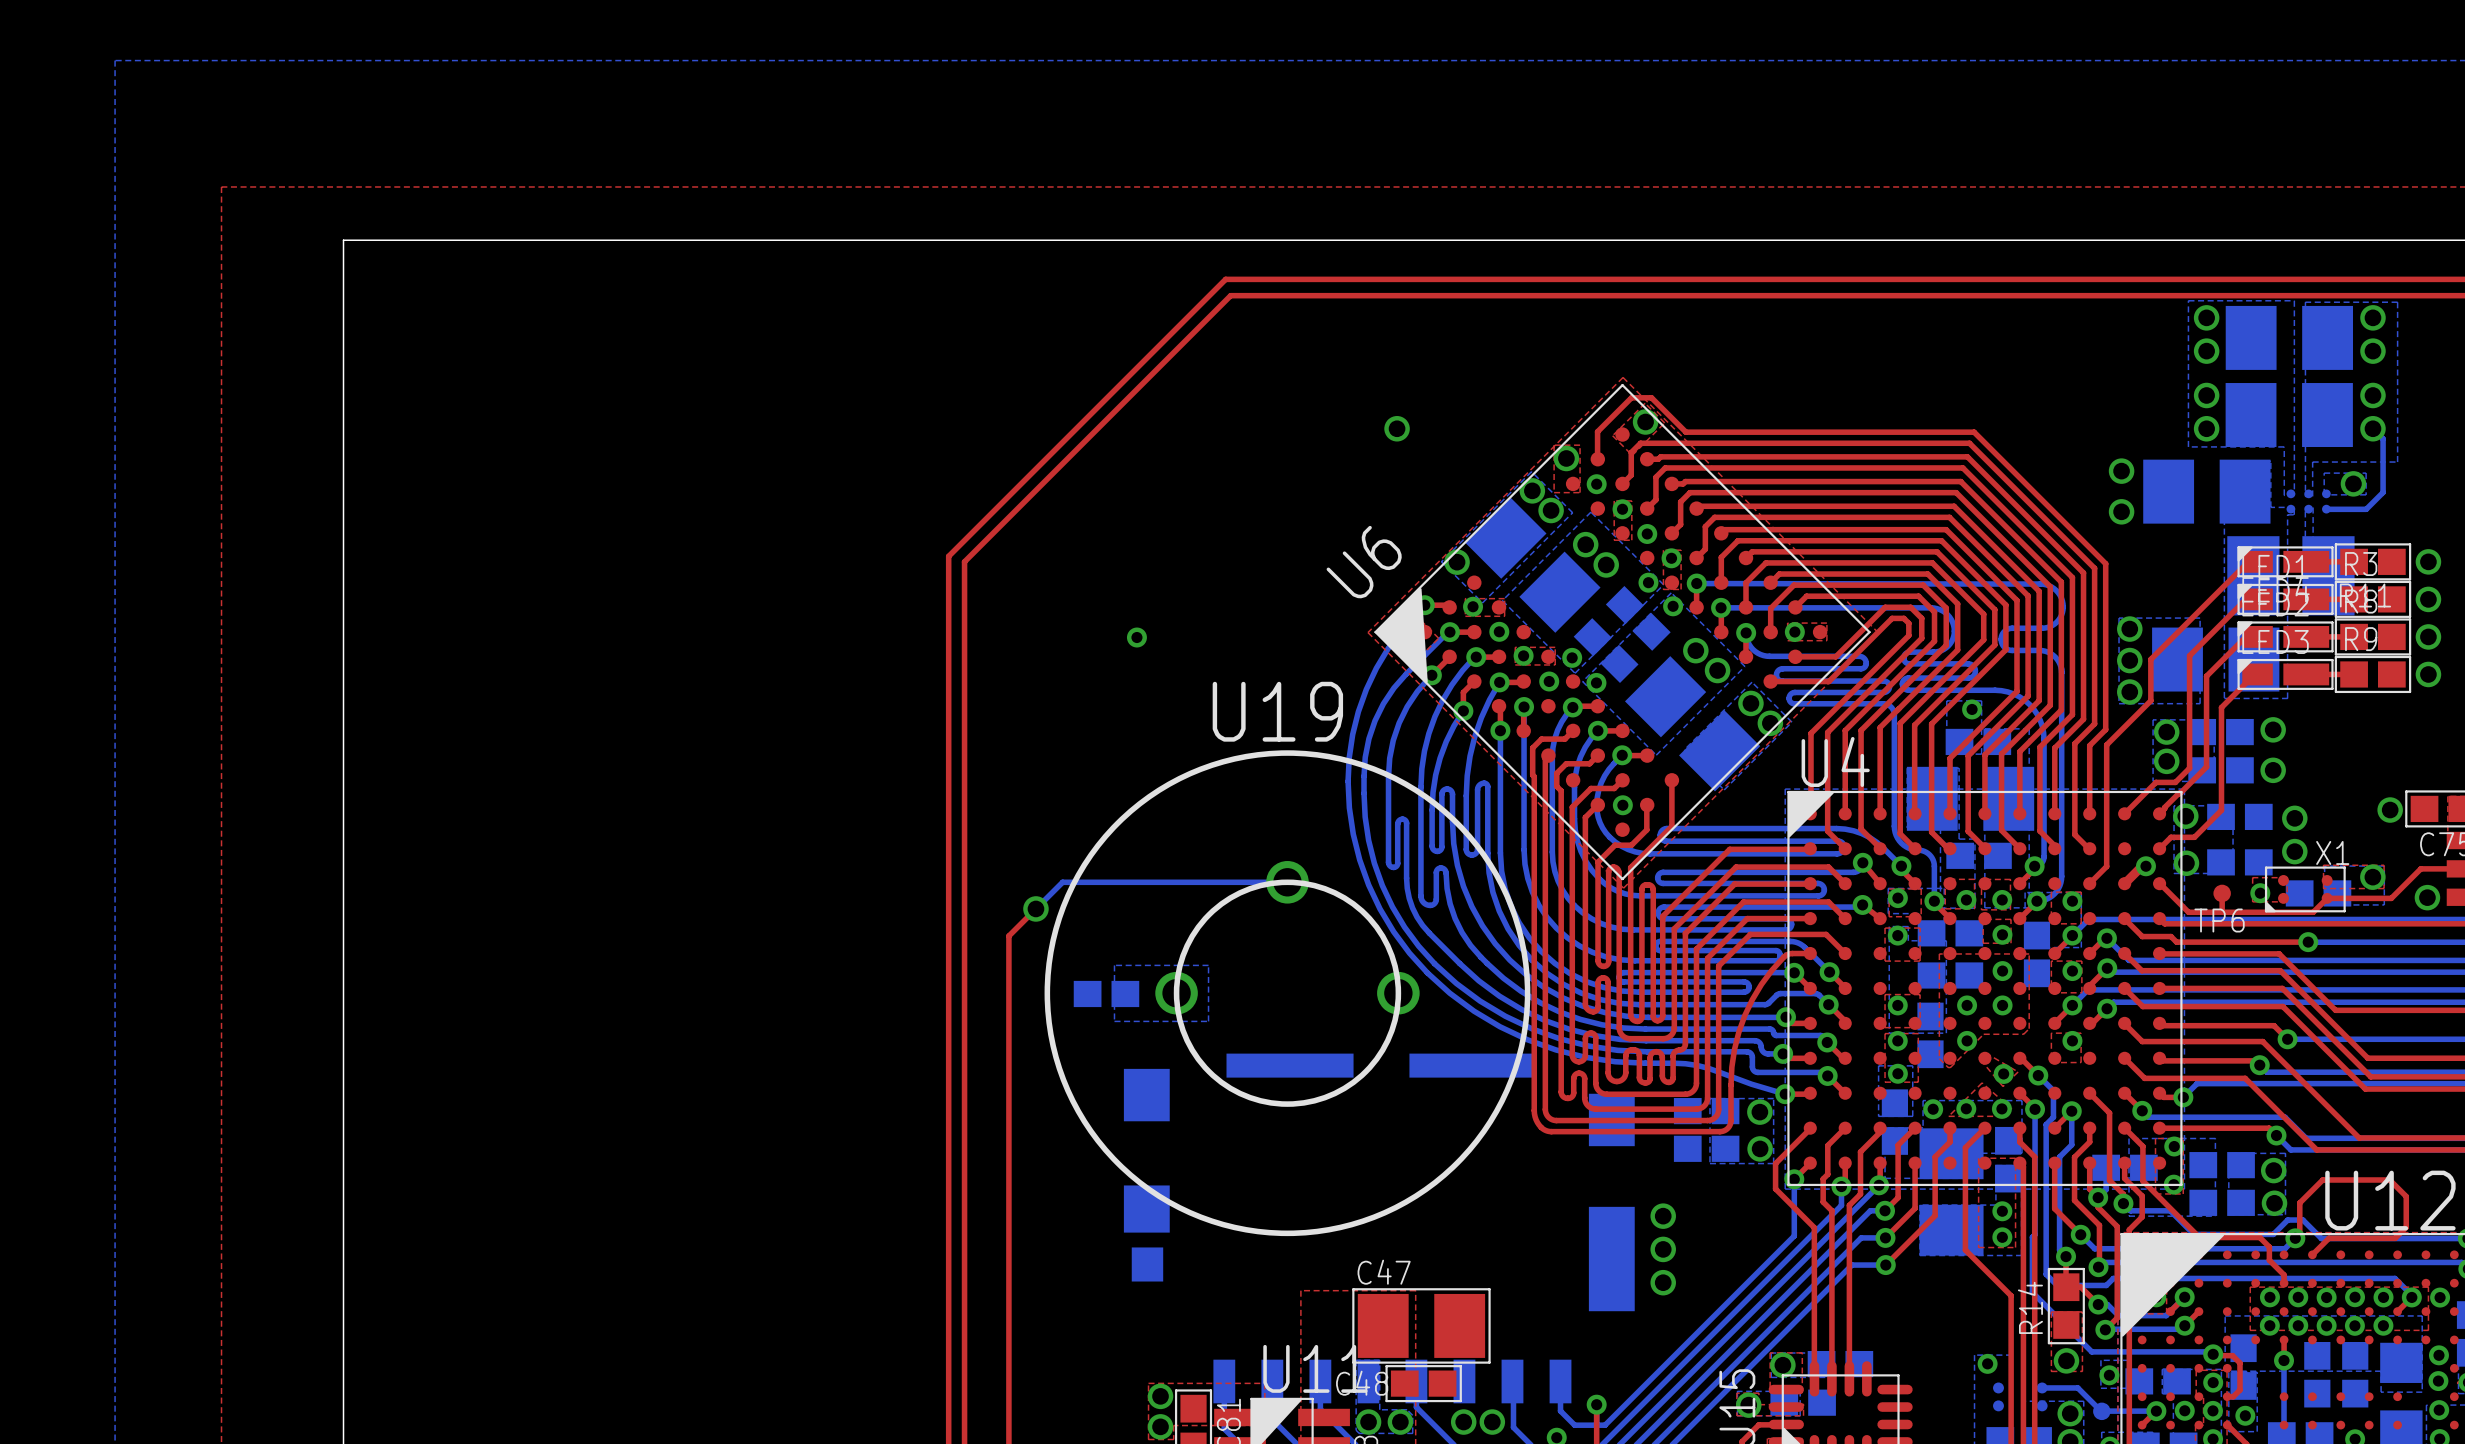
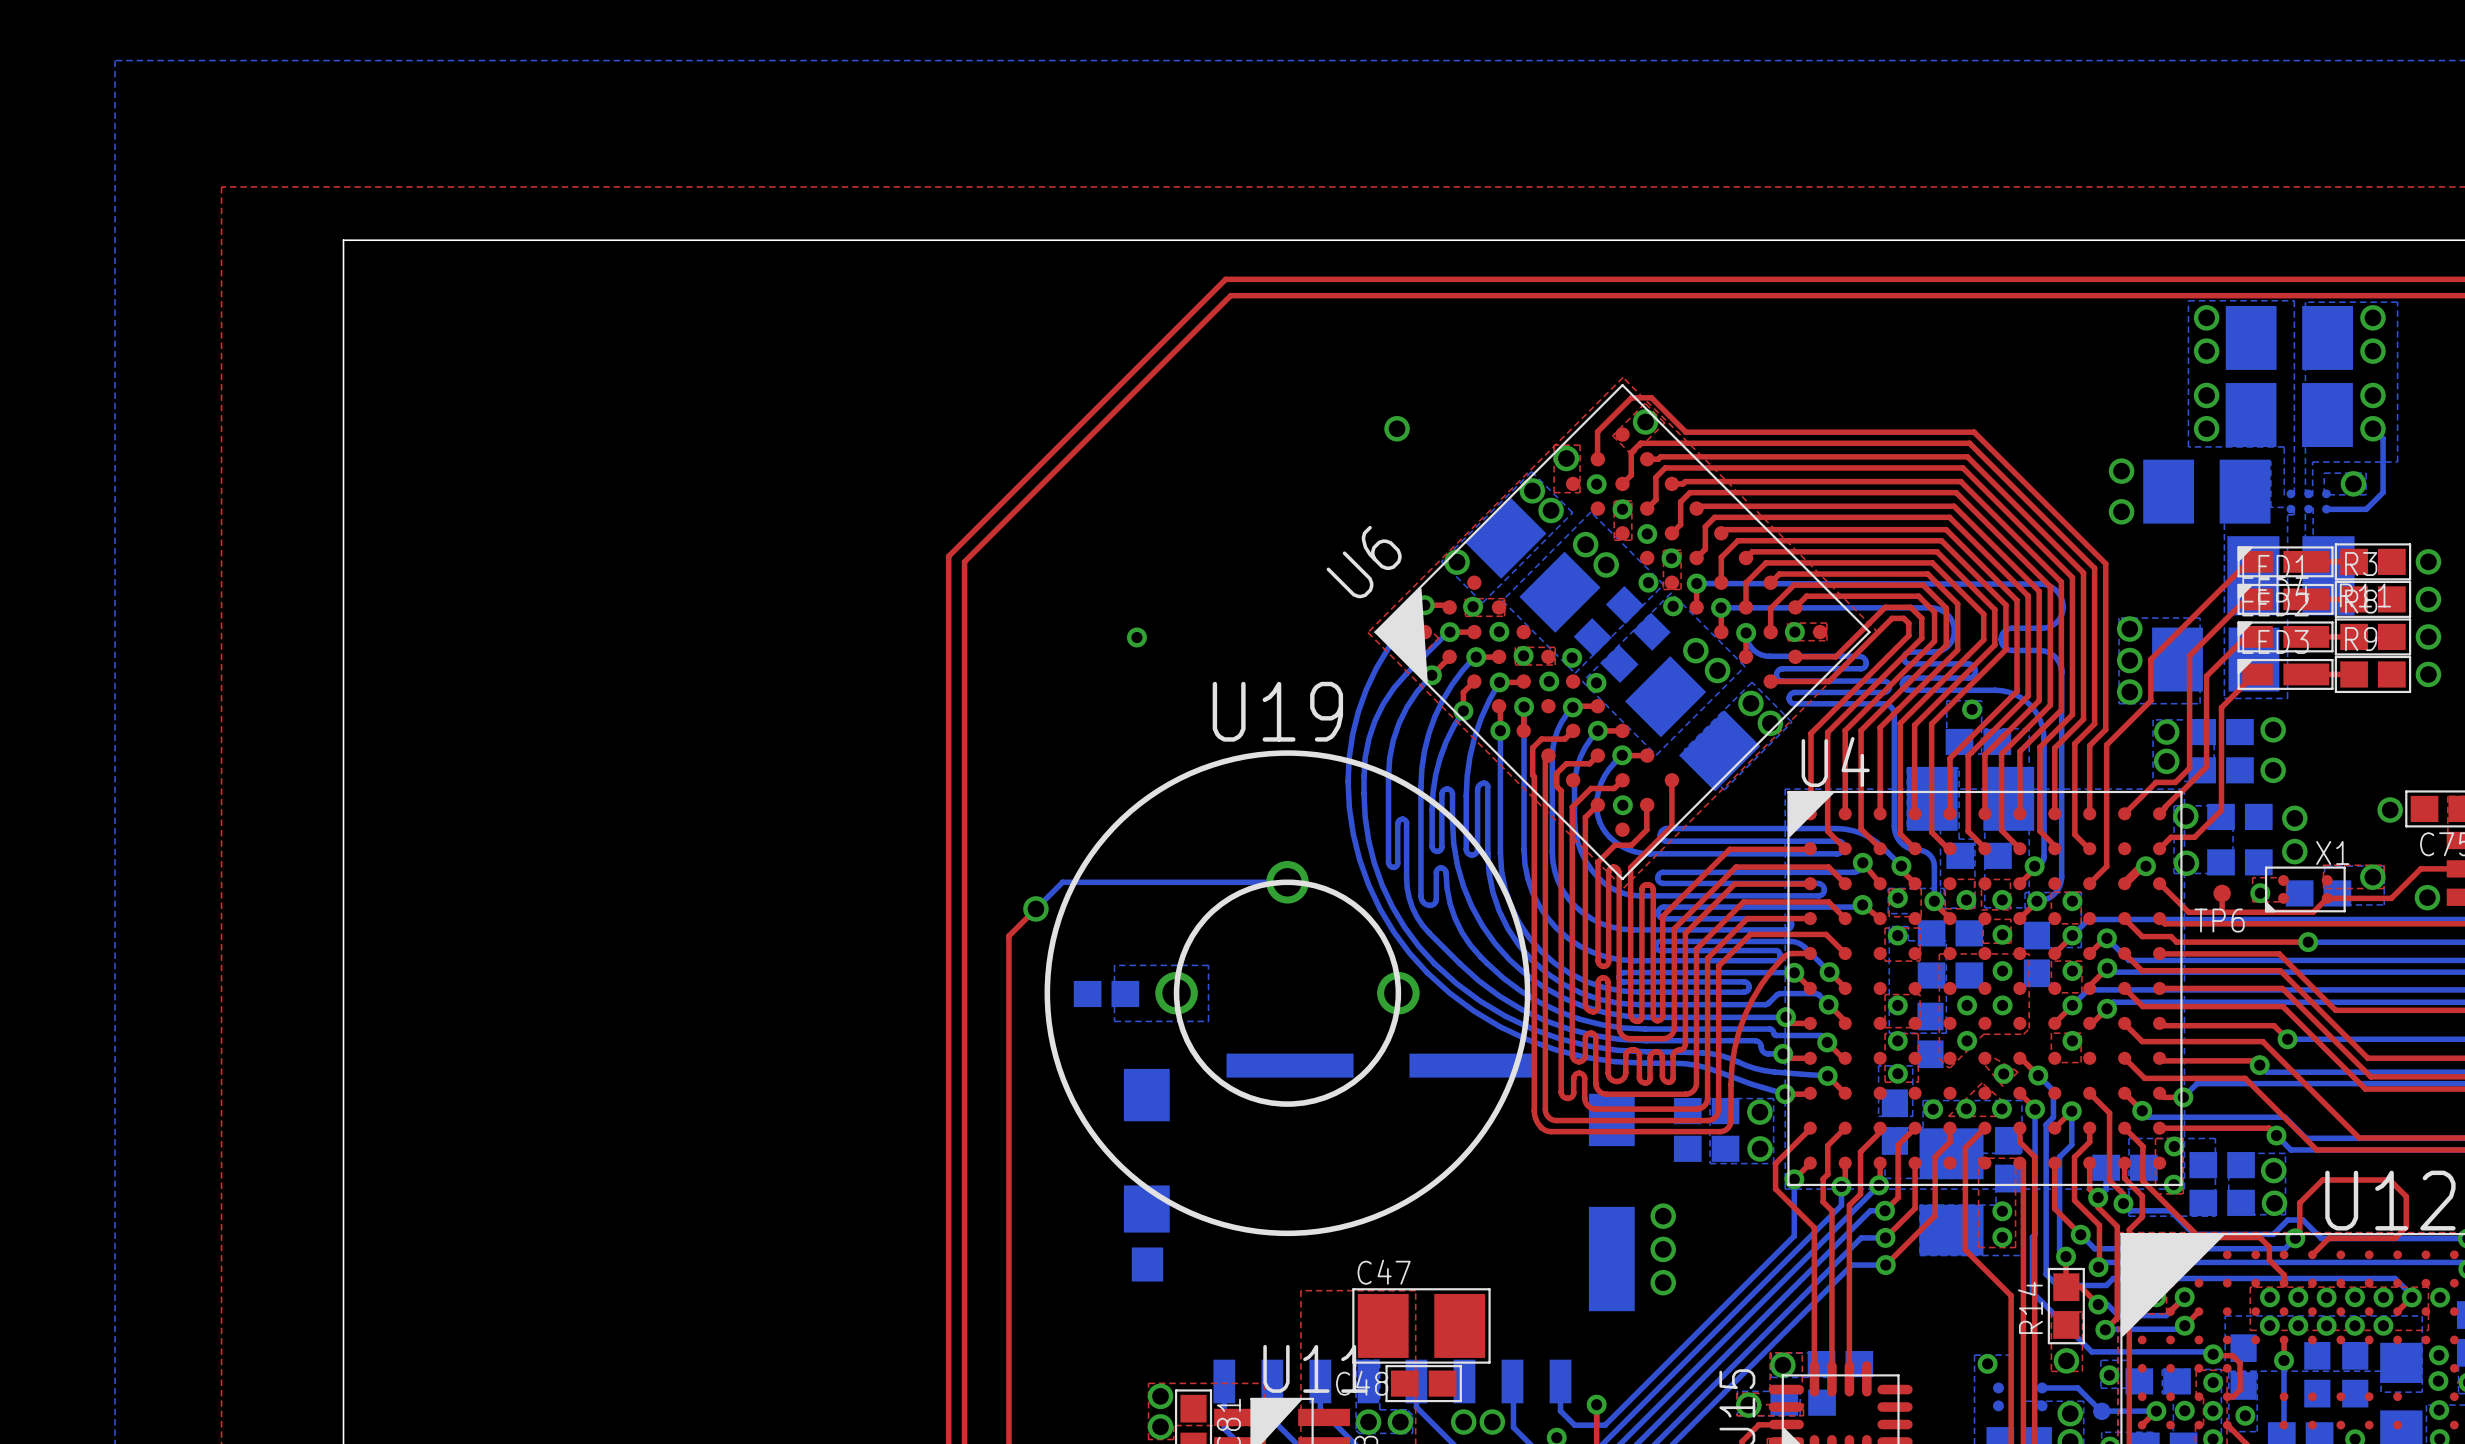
bottom track: (1647, 1051) (1747, 1051) (1751, 1055) (1752, 1068) (1756, 1072) (1824, 1072) (1827, 1075) -> (1647, 1051) (1711, 1053) (1764, 1070) (1827, 1075)

